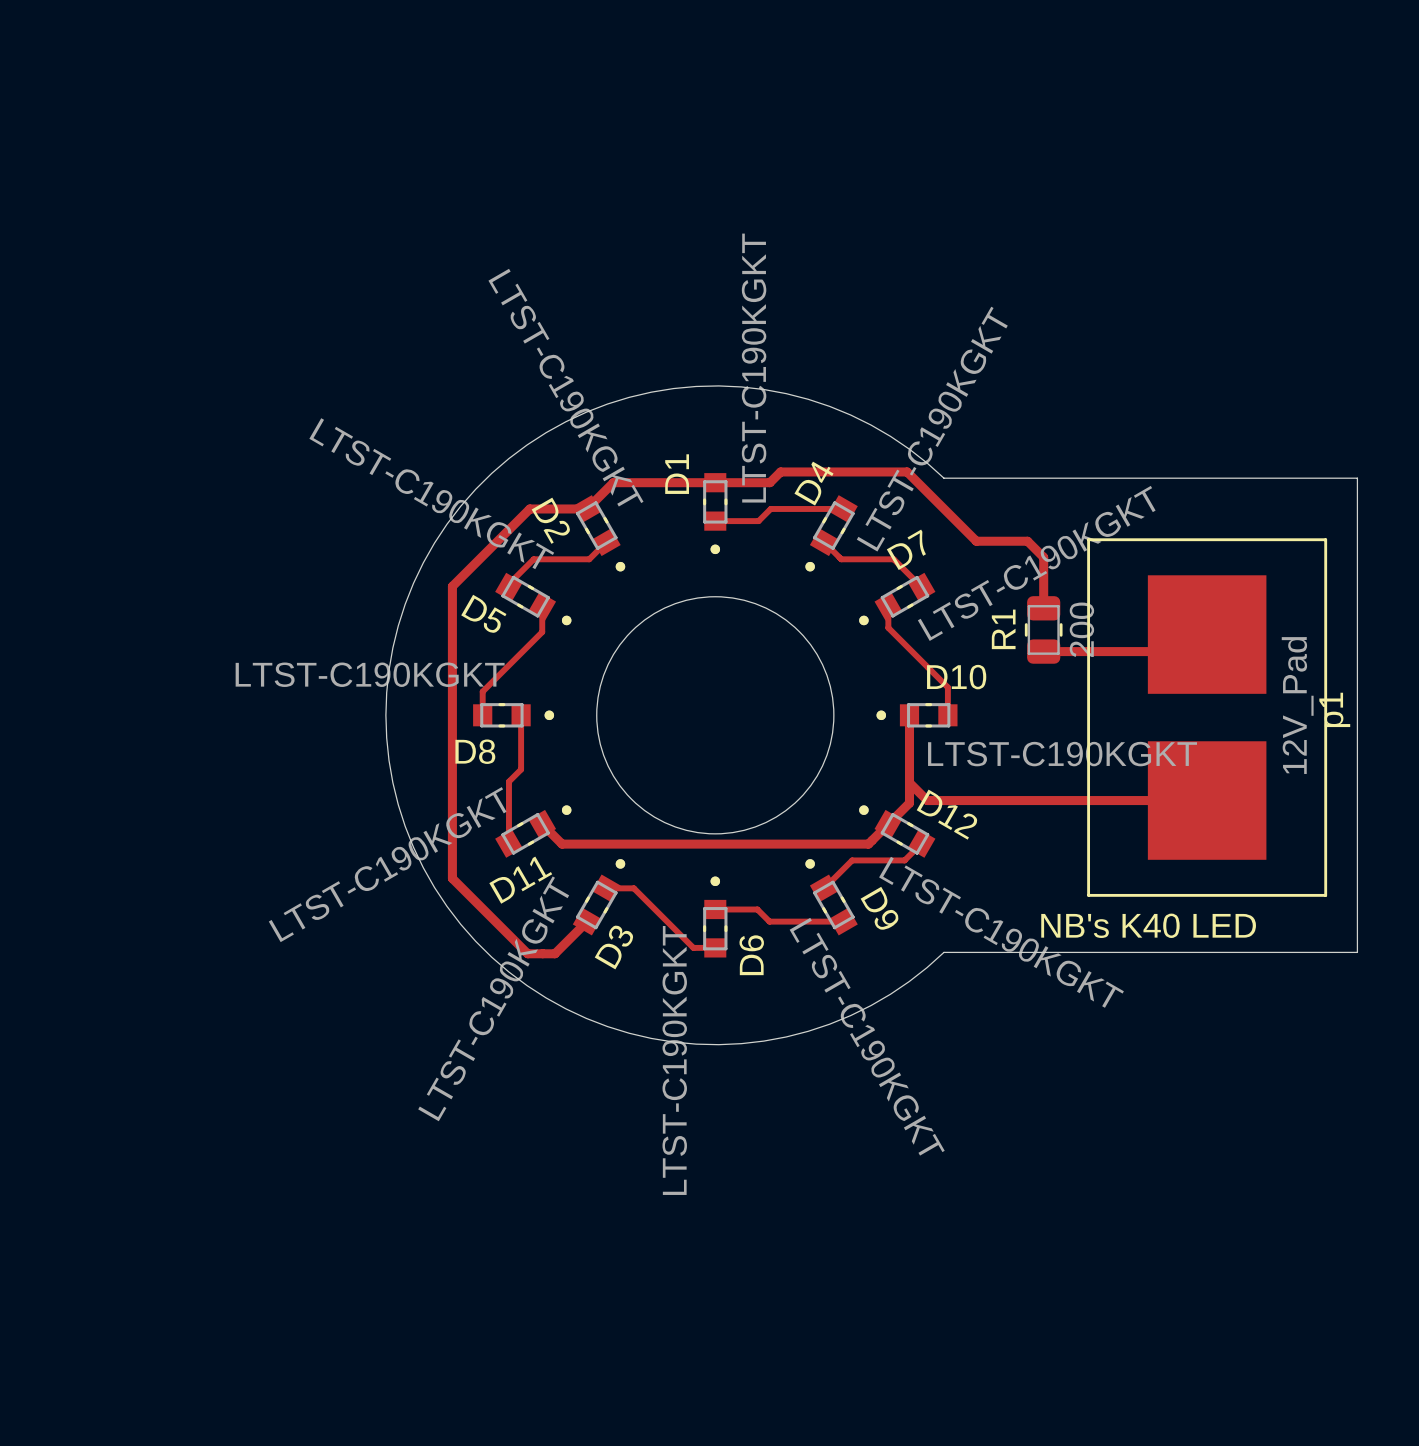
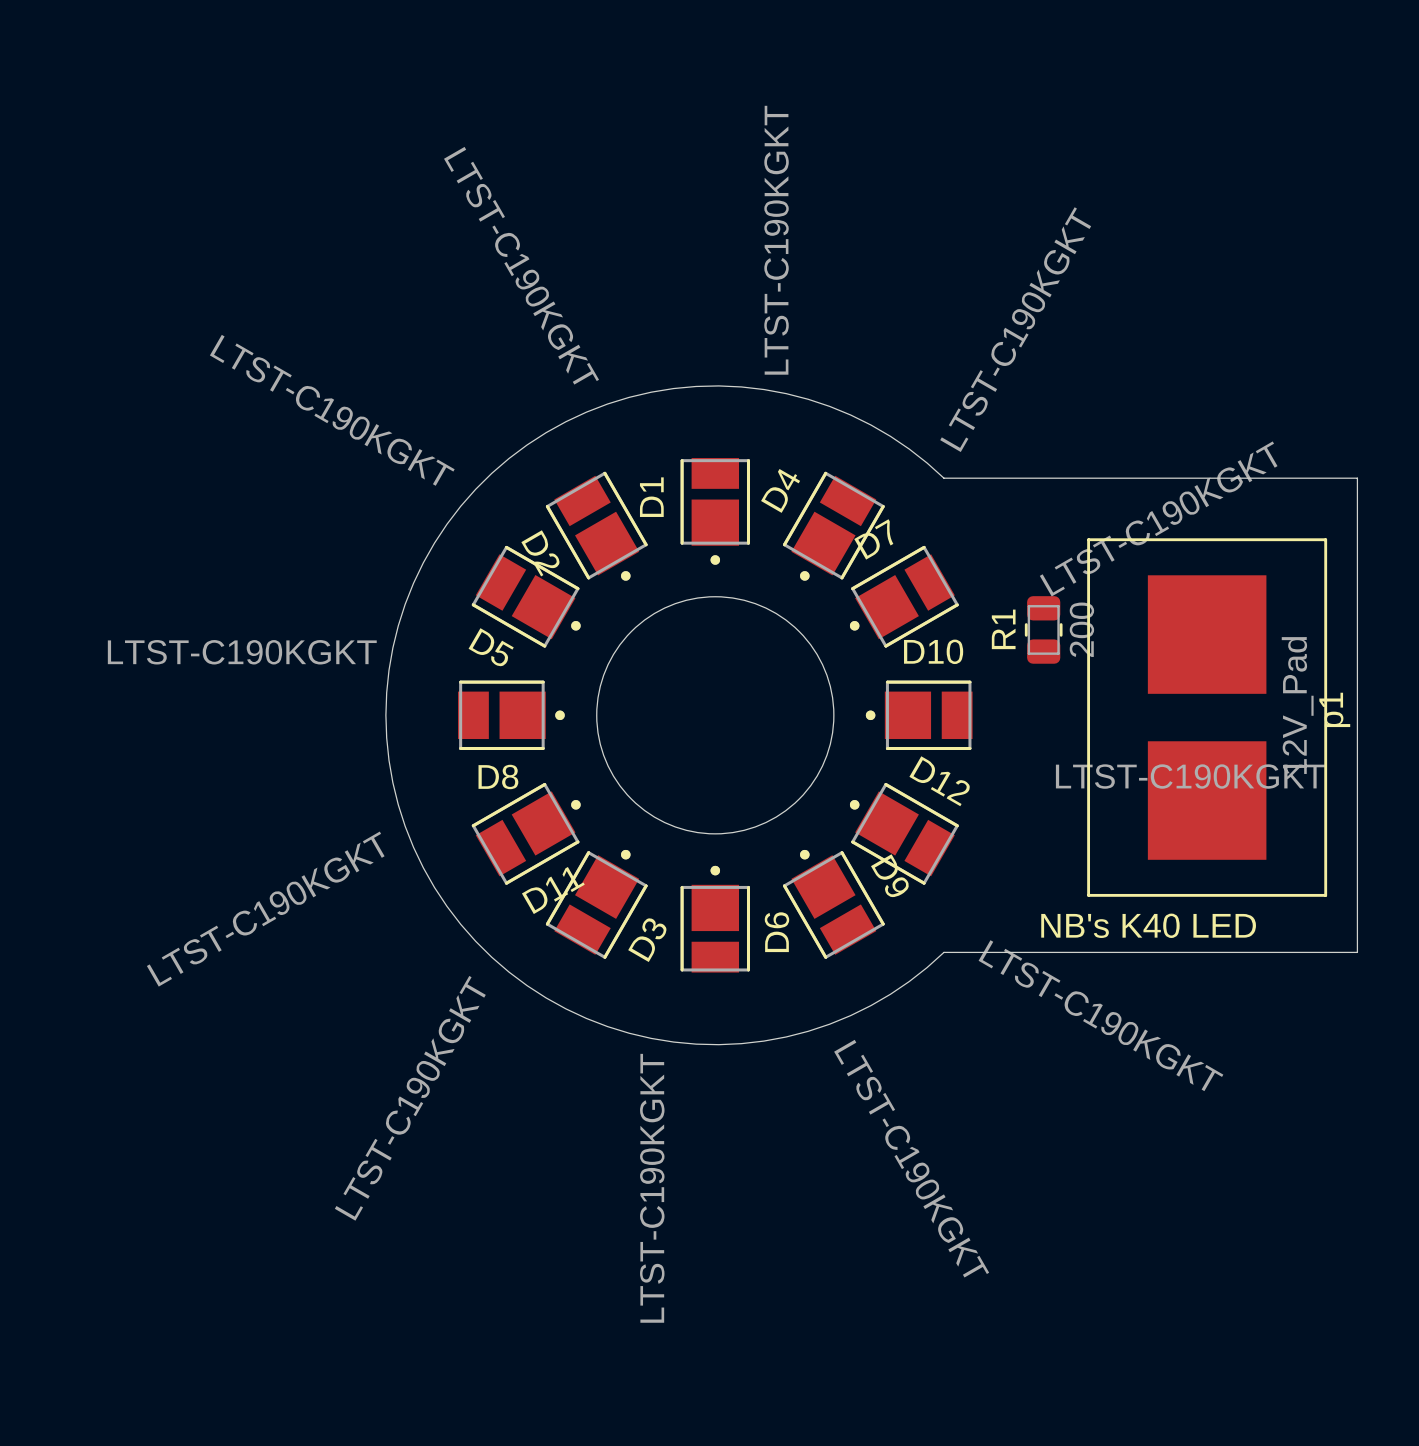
D1 value position: LTST-C190KGKT (754, 368) -> LTST-C190KGKT (776, 240)
D2 value position: LTST-C190KGKT (565, 387) -> LTST-C190KGKT (521, 265)
D4 value position: LTST-C190KGKT (932, 429) -> LTST-C190KGKT (1015, 329)
D1 footprint: [703, 473, 728, 555] -> [680, 458, 751, 565]
D5 value position: LTST-C190KGKT (431, 493) -> LTST-C190KGKT (332, 410)
D2 footprint: [572, 495, 626, 572] -> [545, 471, 648, 581]
D4 footprint: [805, 495, 858, 572] -> [782, 471, 885, 581]
track: (843, 508) (770, 508) (758, 521) (715, 521) -> none
track: (606, 542) (589, 559) (533, 559) (508, 584) (508, 587) -> none
track: (824, 542) (841, 559) (893, 559) (921, 587) -> none
D7 value position: LTST-C190KGKT (1036, 563) -> LTST-C190KGKT (1158, 518)
D5 footprint: [495, 572, 572, 626] -> [471, 545, 581, 648]
D7 footprint: [859, 572, 936, 626] -> [849, 545, 959, 648]
track: (542, 606) (542, 632) (482, 691) (482, 715) -> none
track: (888, 606) (888, 627) (947, 687) (947, 715) -> none
track: (1043, 608) (1043, 557) (1027, 541) (976, 541) (907, 471) (780, 471) (769, 482) (613, 482) (587, 508) (529, 508) (452, 586) (452, 878) (527, 953) (554, 953) (587, 921) -> none
track: (1207, 634) (1190, 651) (1043, 651) -> none
D8 value position: LTST-C190KGKT (370, 674) -> LTST-C190KGKT (242, 652)
D8 footprint: [473, 703, 555, 728] -> [458, 680, 565, 751]
D10 footprint: [876, 703, 958, 728] -> [865, 680, 973, 751]
track: (521, 715) (521, 769) (508, 781) (508, 843) -> none
track: (909, 715) (909, 803) (868, 844) (562, 844) (542, 824) -> none
D10 value position: LTST-C190KGKT (1062, 754) -> LTST-C190KGKT (1190, 776)
track: (909, 782) (927, 800) (1207, 800) -> none
D11 footprint: [495, 805, 572, 858] -> [471, 782, 581, 885]
D12 footprint: [859, 805, 936, 858] -> [849, 782, 959, 885]
track: (921, 843) (904, 860) (852, 860) (824, 888) -> none
D3 footprint: [572, 859, 626, 936] -> [545, 849, 648, 959]
D9 footprint: [805, 859, 858, 936] -> [782, 849, 885, 959]
D11 value position: LTST-C190KGKT (387, 864) -> LTST-C190KGKT (265, 909)
D6 footprint: [703, 876, 728, 958] -> [680, 865, 751, 973]
track: (606, 888) (633, 888) (693, 947) (715, 947) -> none
track: (715, 909) (757, 909) (769, 921) (843, 921) -> none
D12 value position: LTST-C190KGKT (1001, 932) -> LTST-C190KGKT (1100, 1015)
D3 value position: LTST-C190KGKT (493, 998) -> LTST-C190KGKT (410, 1098)
D9 value position: LTST-C190KGKT (867, 1036) -> LTST-C190KGKT (911, 1158)
D6 value position: LTST-C190KGKT (674, 1060) -> LTST-C190KGKT (652, 1188)

